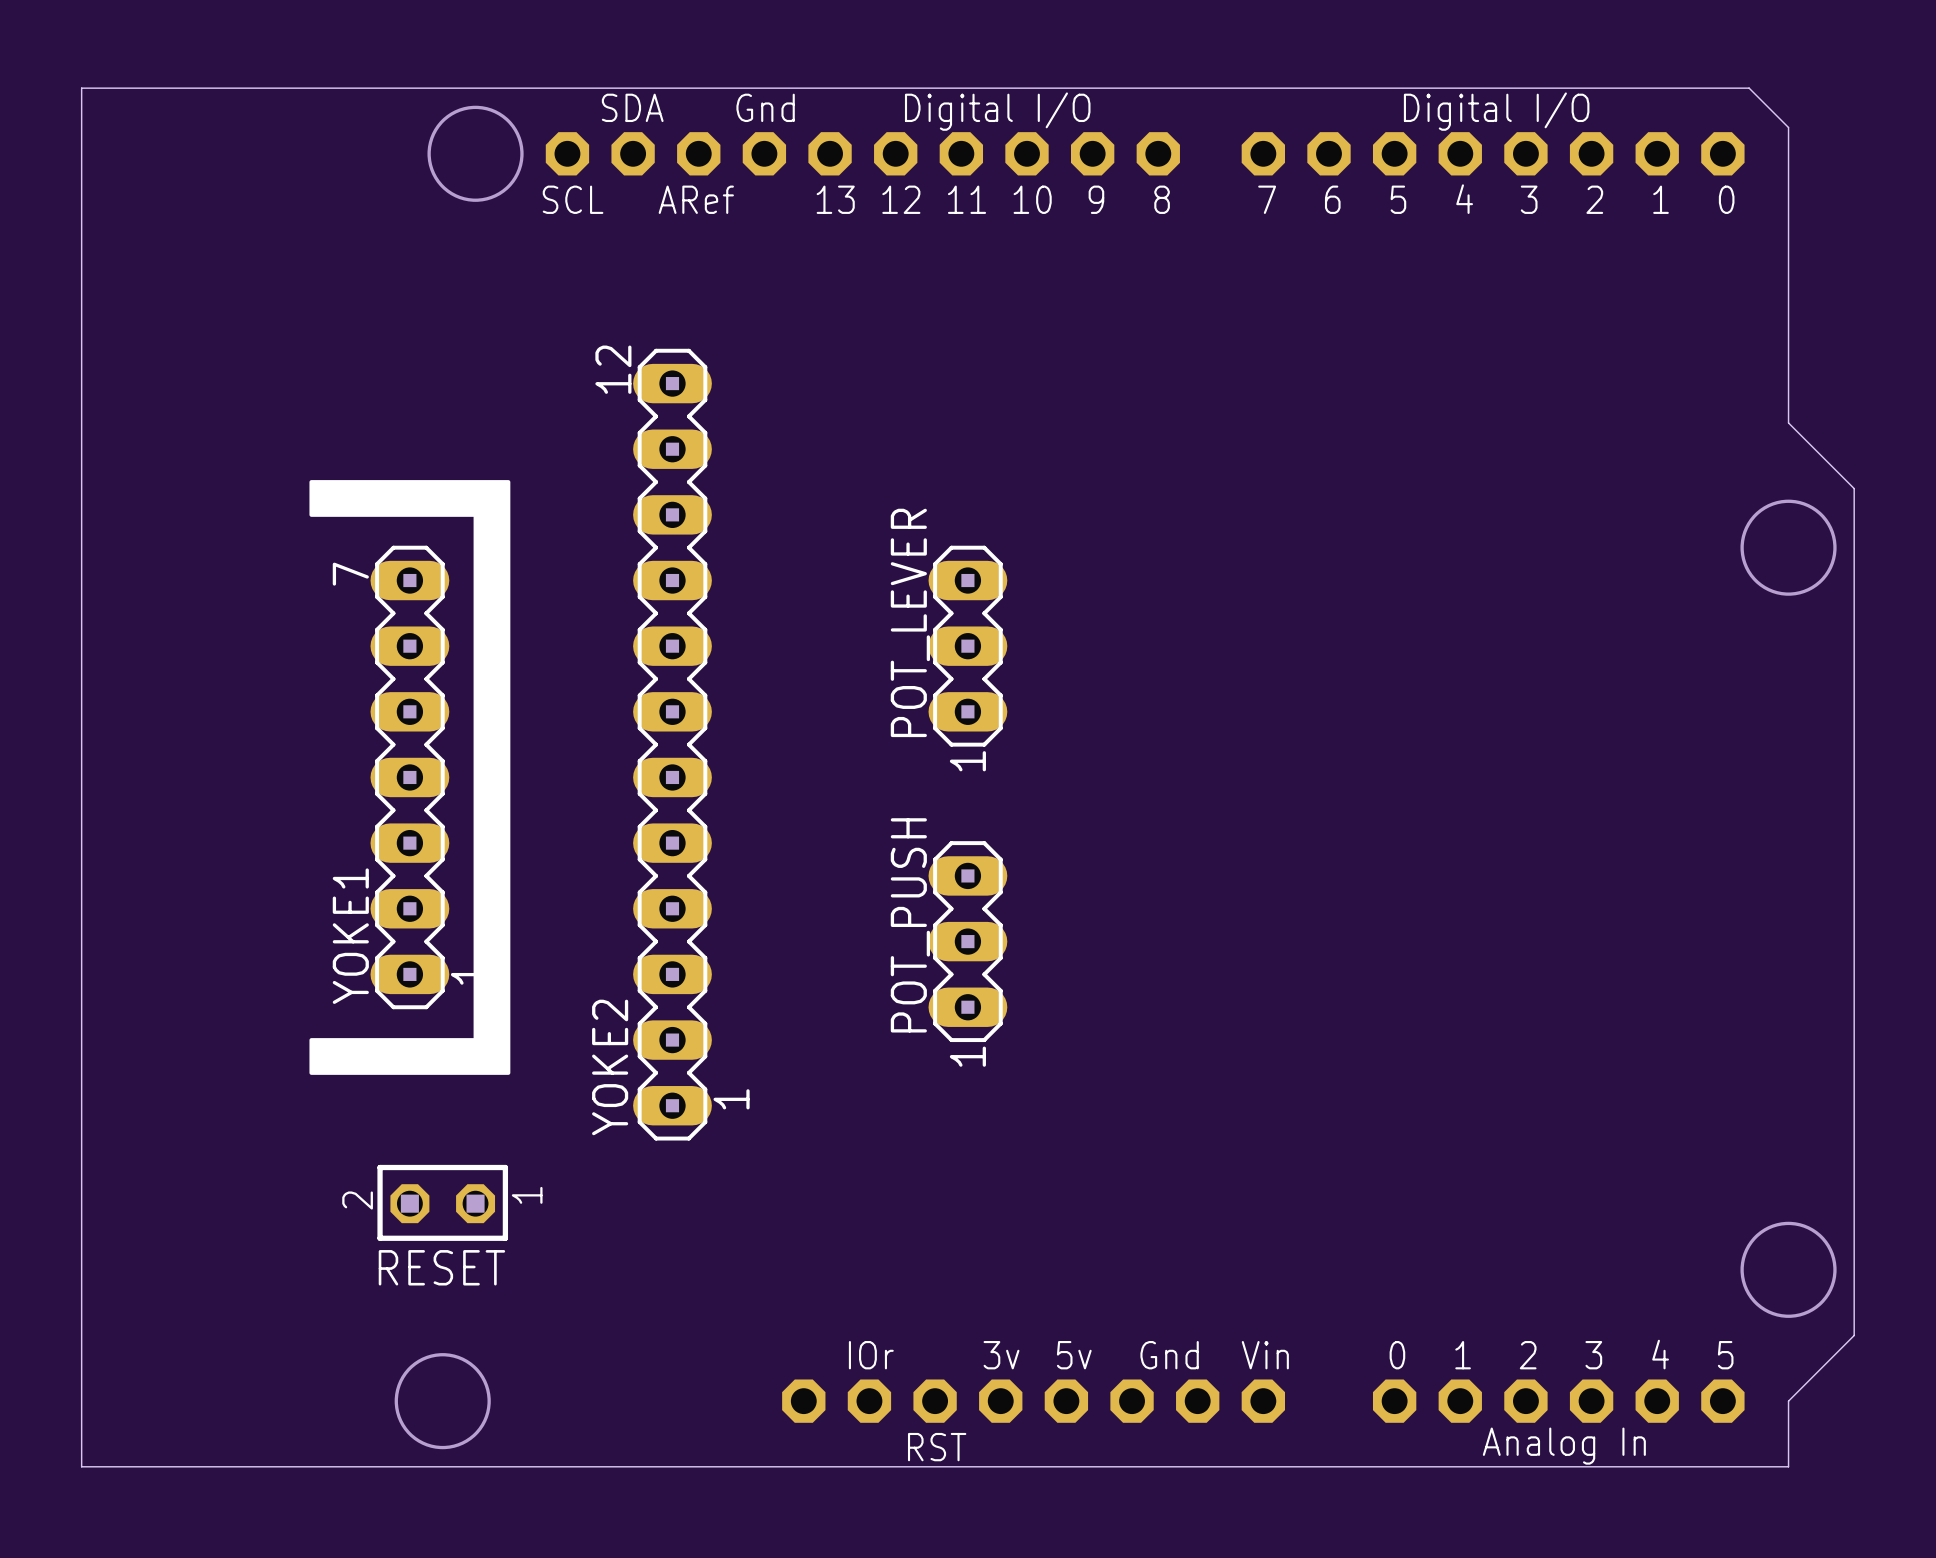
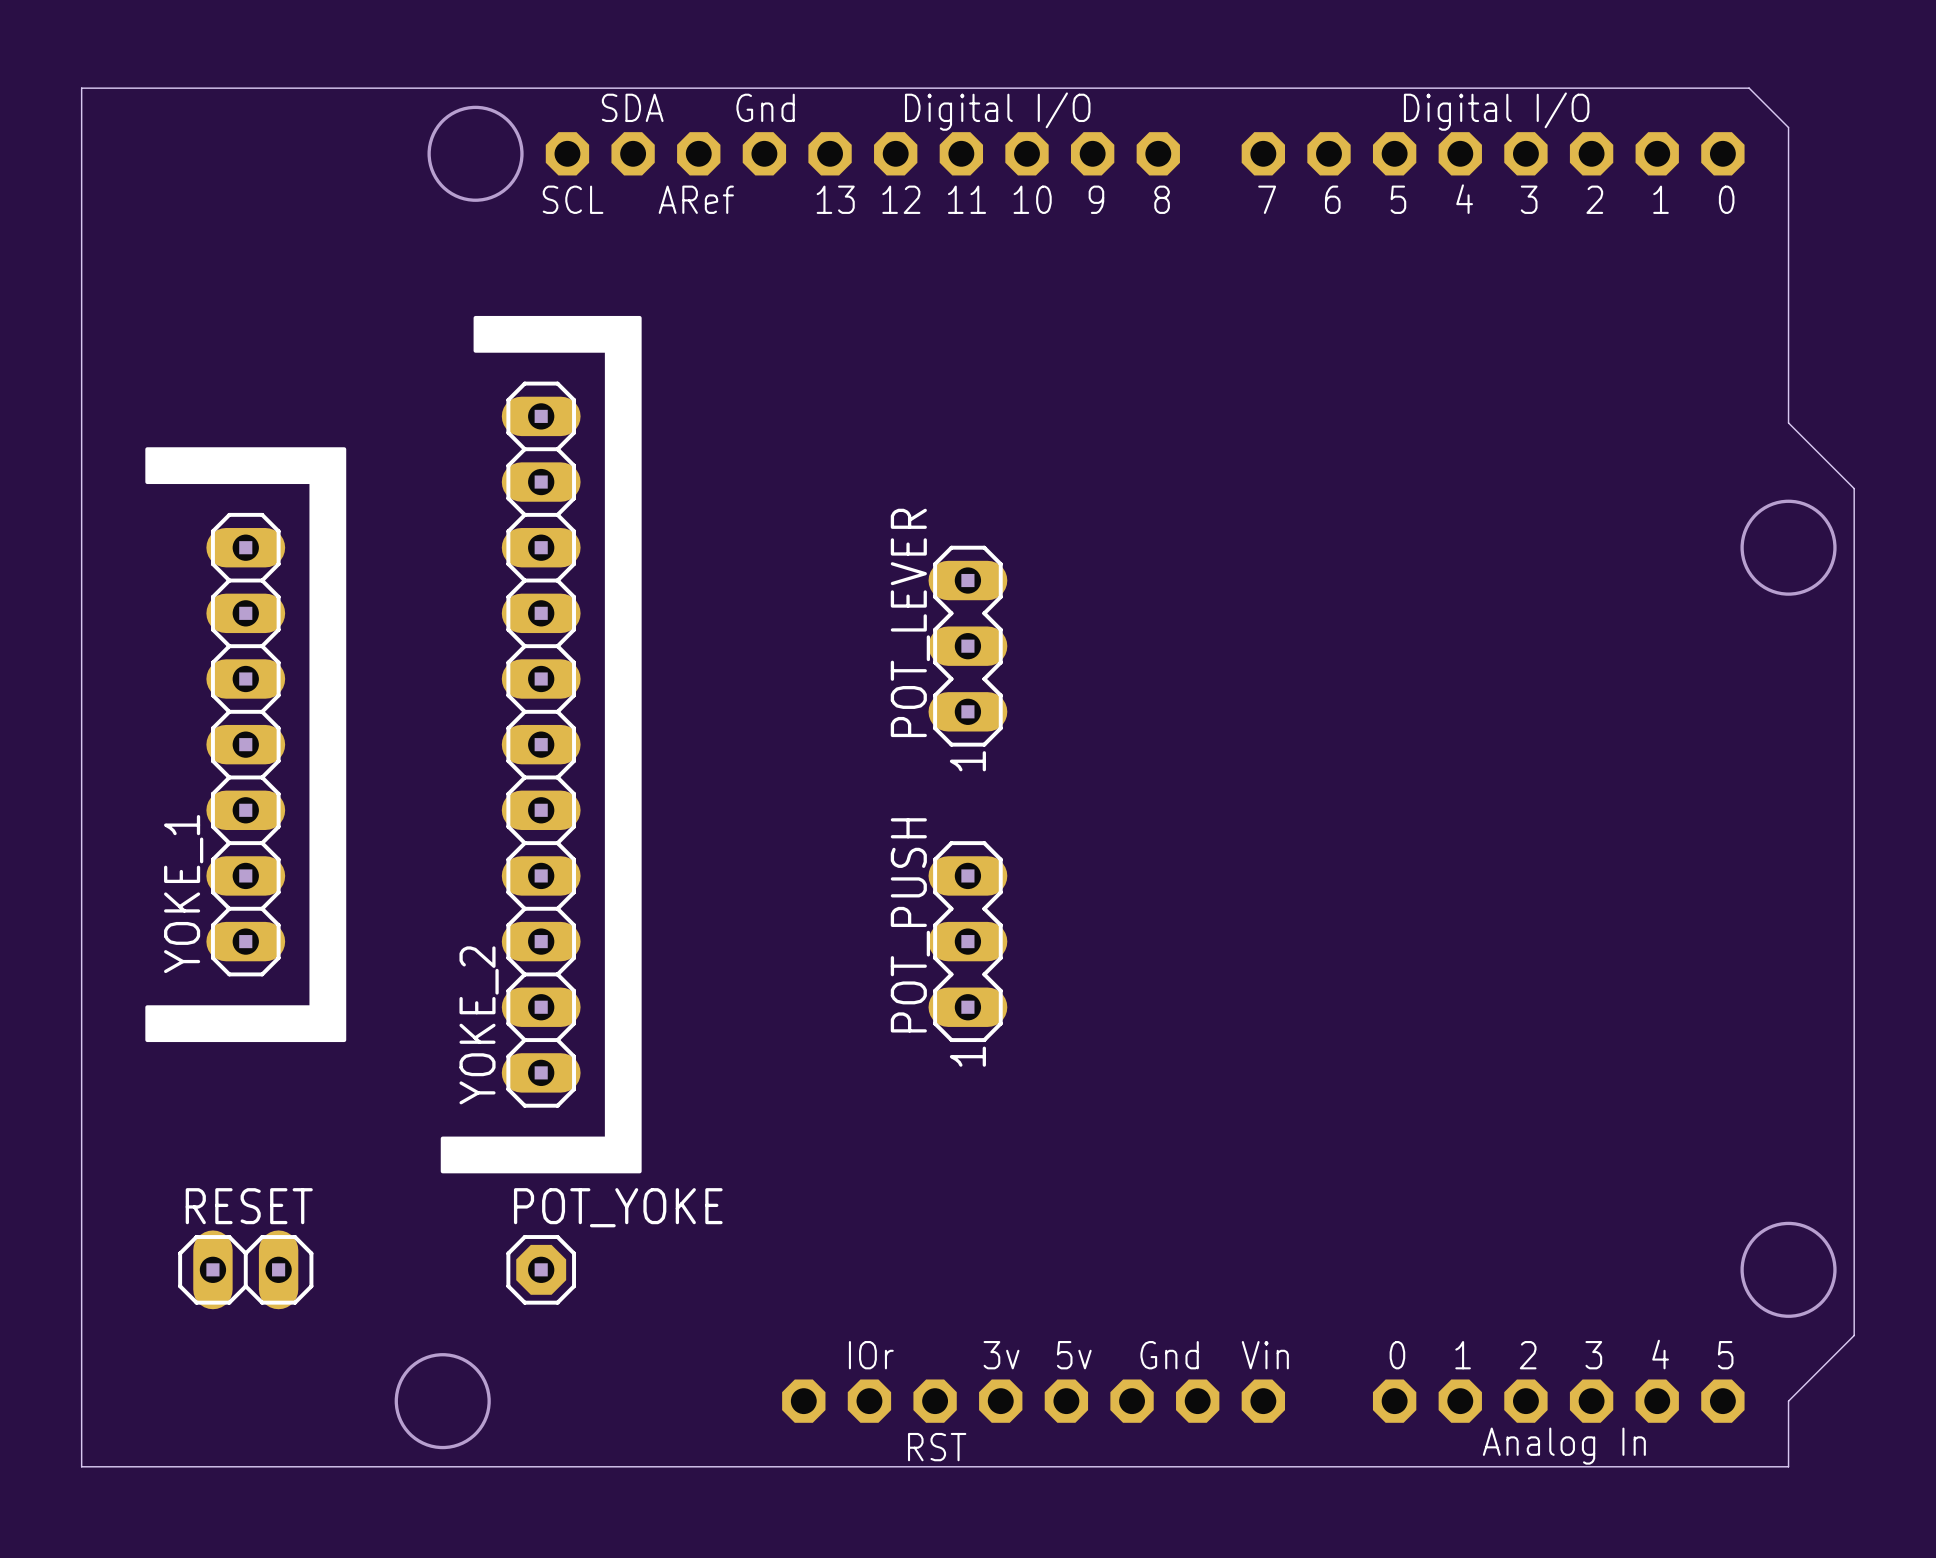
drawing: none -> [440, 315, 642, 1174]
YOKE_1: none -> (245, 744)
YOKE_2: none -> (541, 744)
YOKE2: (672, 744) -> none
drawing position: (409, 777) -> (245, 744)
YOKE1: (409, 777) -> none
RESET: (442, 1202) -> none
RESET: none -> (245, 1269)
POT_YOKE: none -> (541, 1269)

